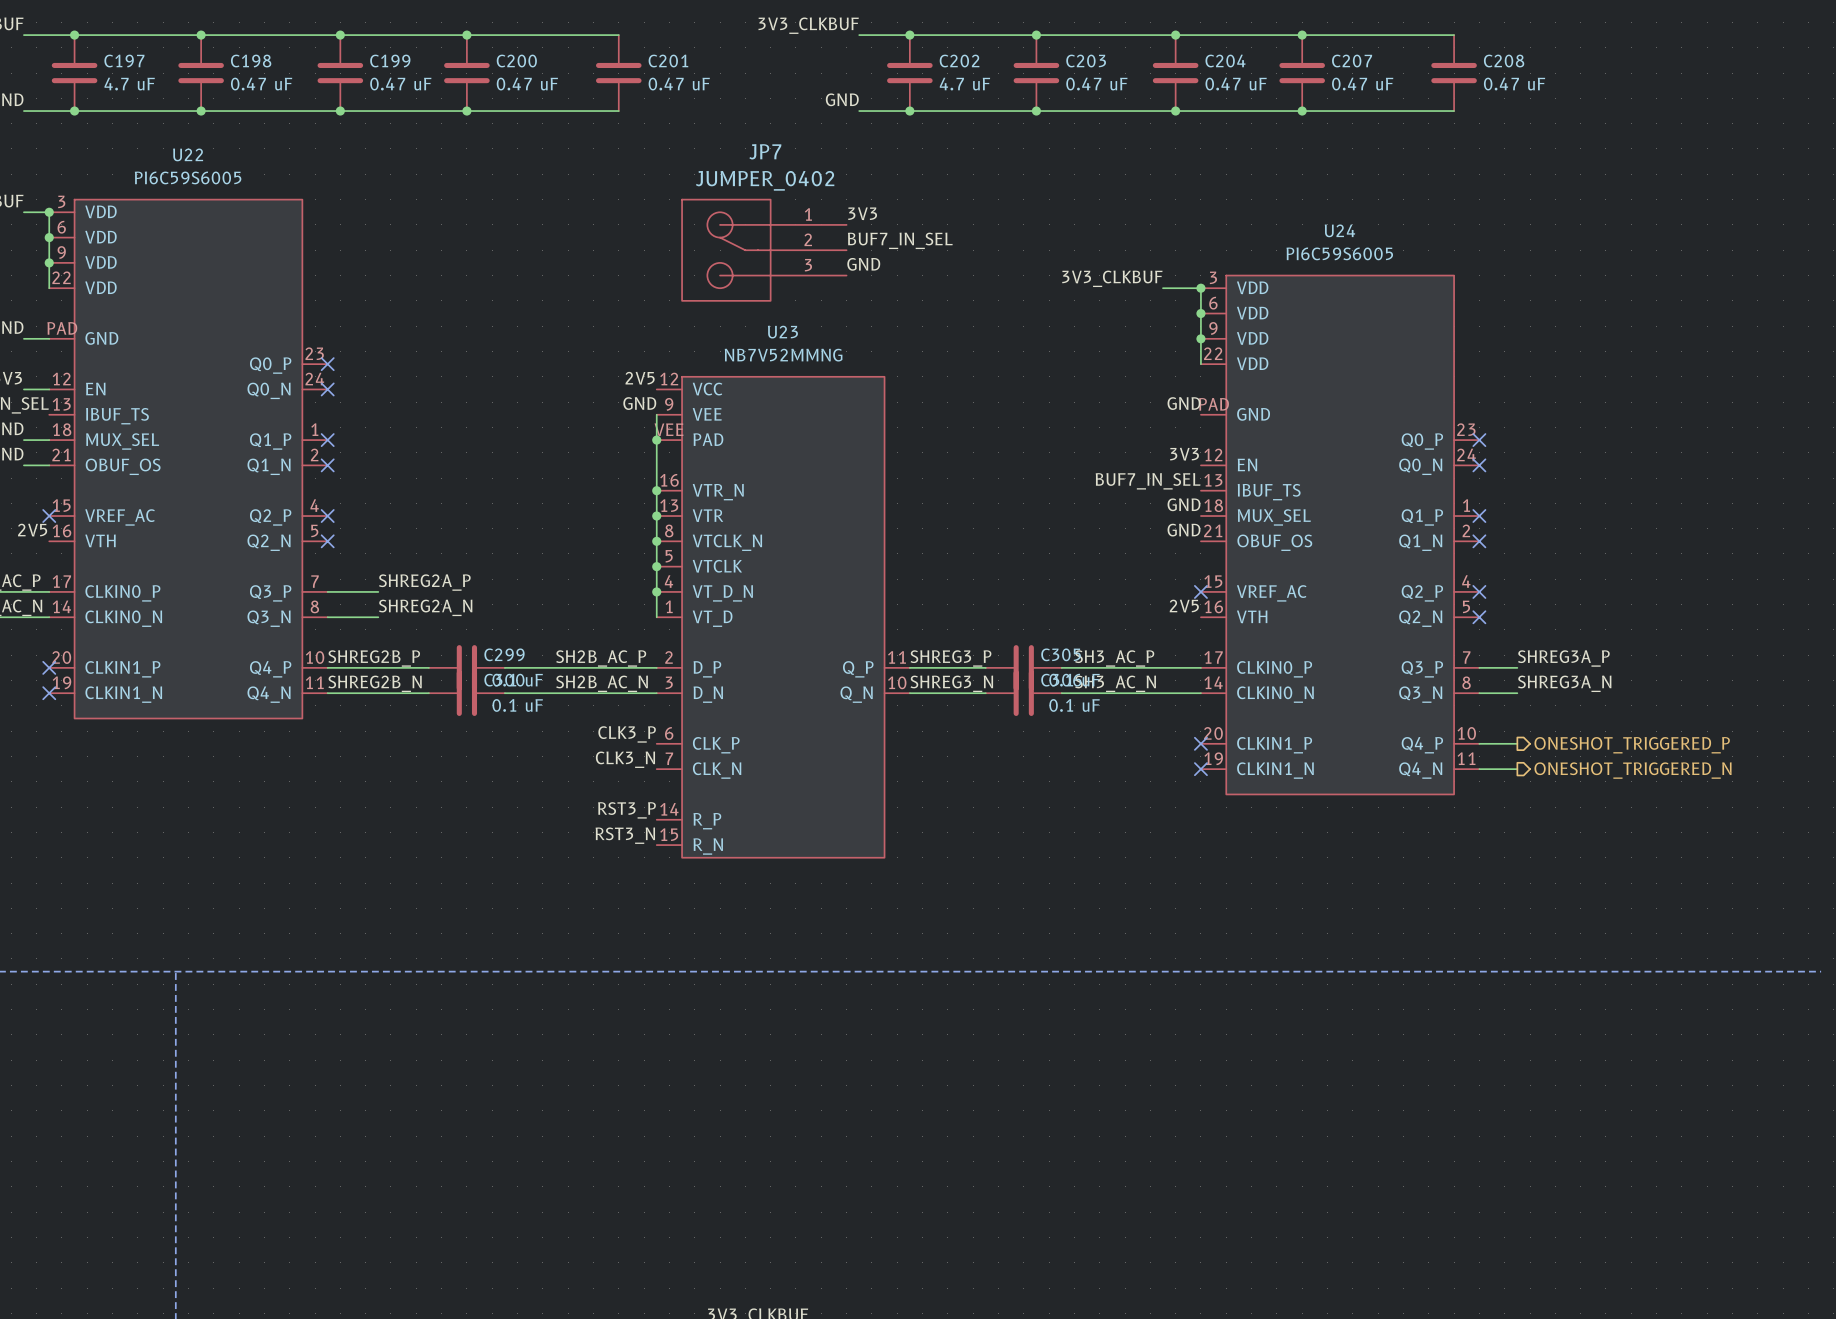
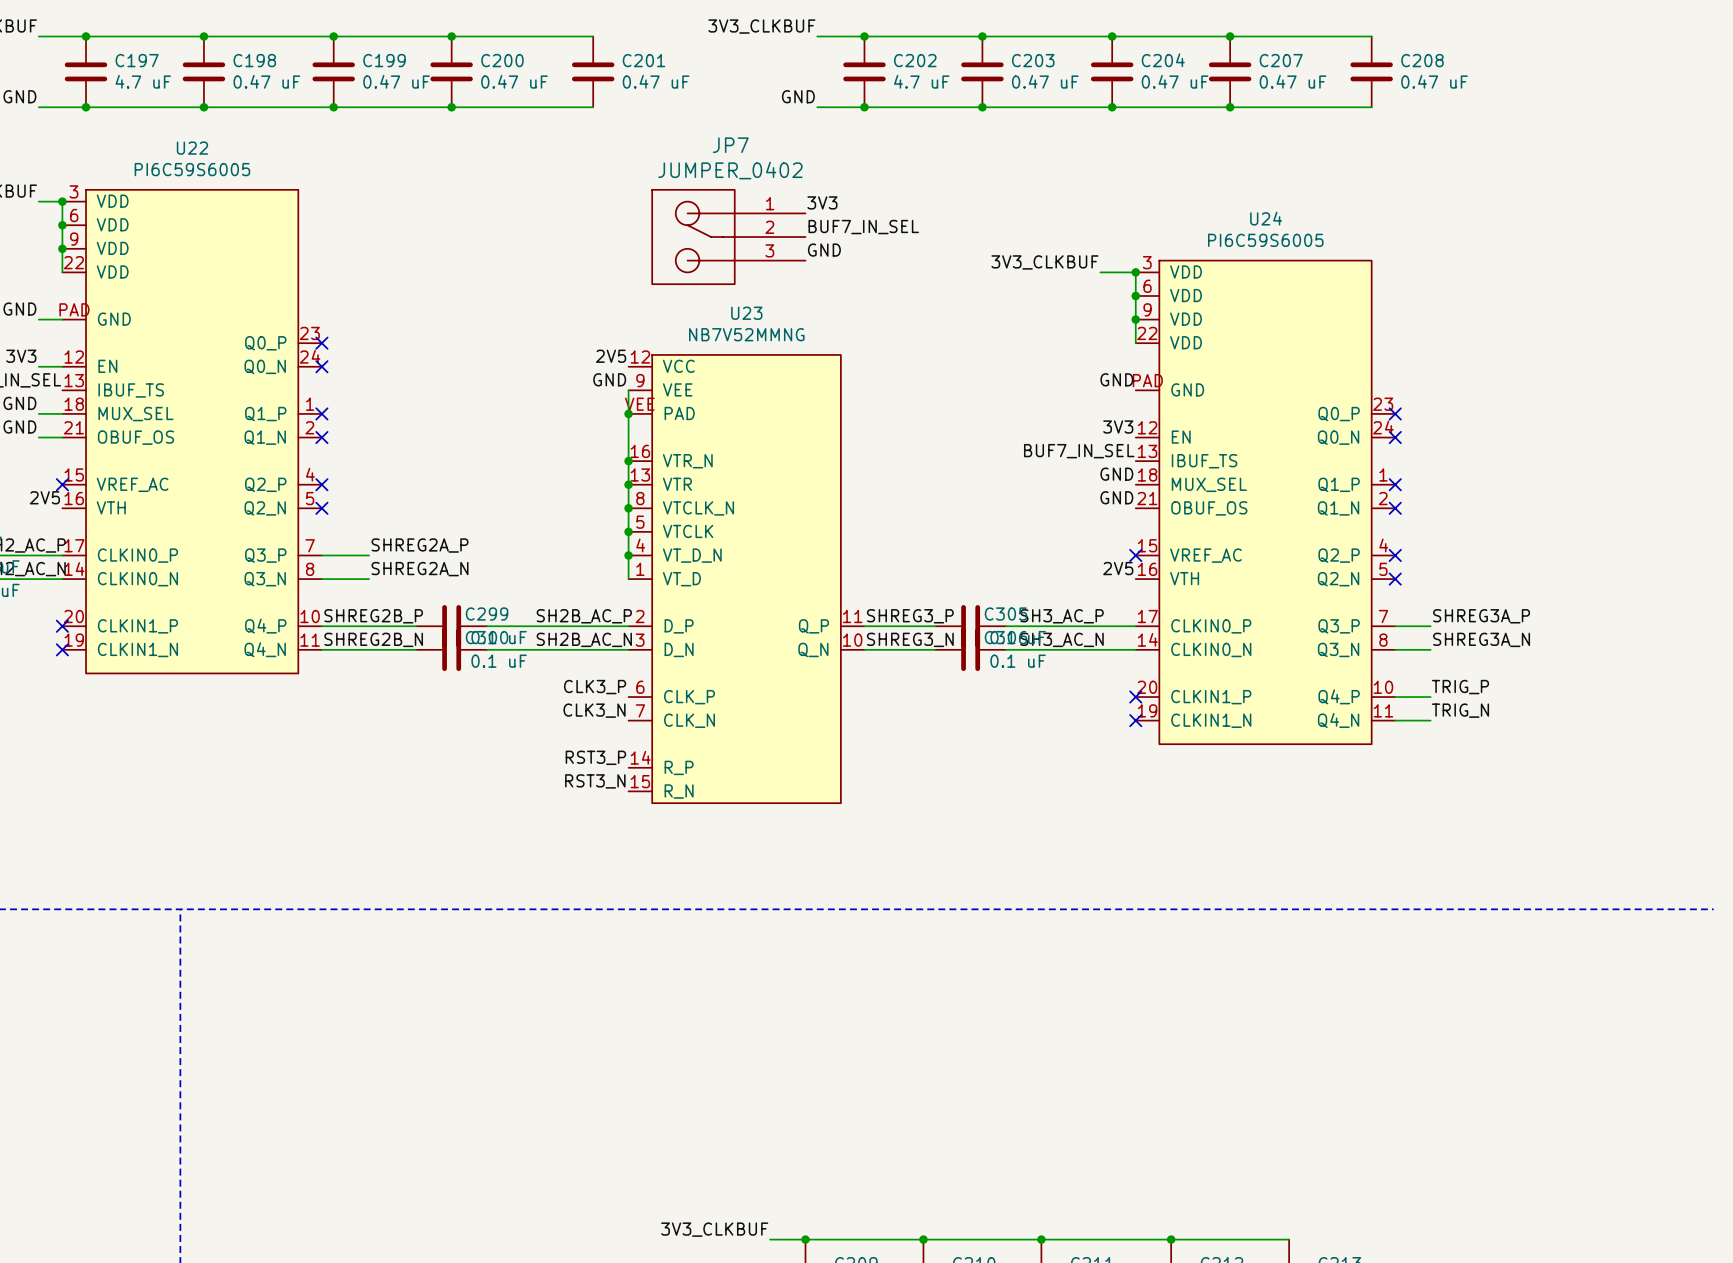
label: none -> TRIG_P (1460, 687)
hierarchical label: ONESHOT_TRIGGERED_P (1632, 745) -> none
label: none -> TRIG_N (1460, 710)
hierarchical label: ONESHOT_TRIGGERED_N (1633, 770) -> none

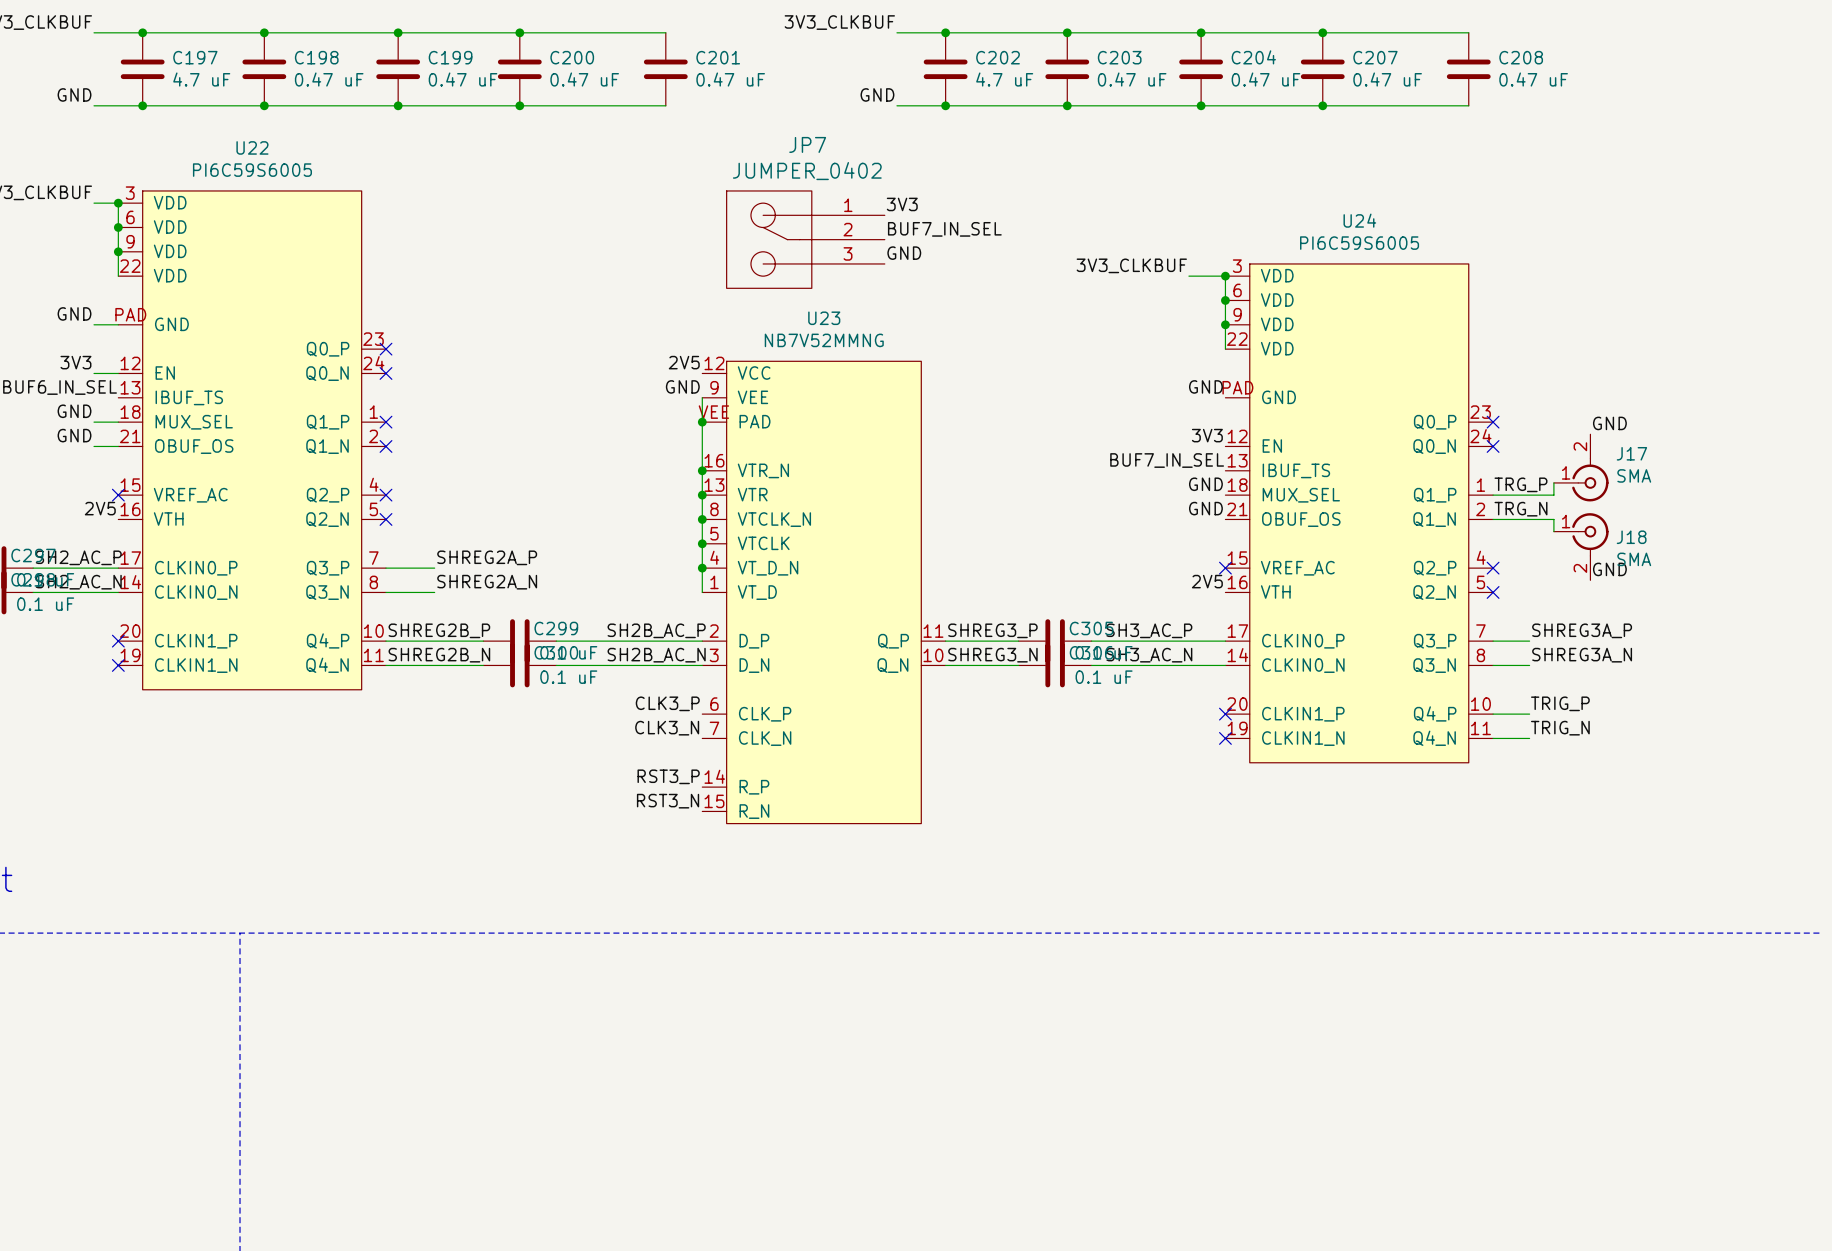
label: none -> GND (1609, 423)
J17: none -> SMA (1581, 467)
wire: none -> (1553, 482) (1553, 495) (1493, 495)
label: none -> TRG_P (1520, 484)
no-connect mark: (1395, 484) -> none
label: none -> TRG_N (1520, 509)
wire: none -> (1493, 519) (1553, 519) (1553, 531)
no-connect mark: (1395, 508) -> none
J18: none -> SMA (1581, 546)
label: none -> GND (1609, 569)

